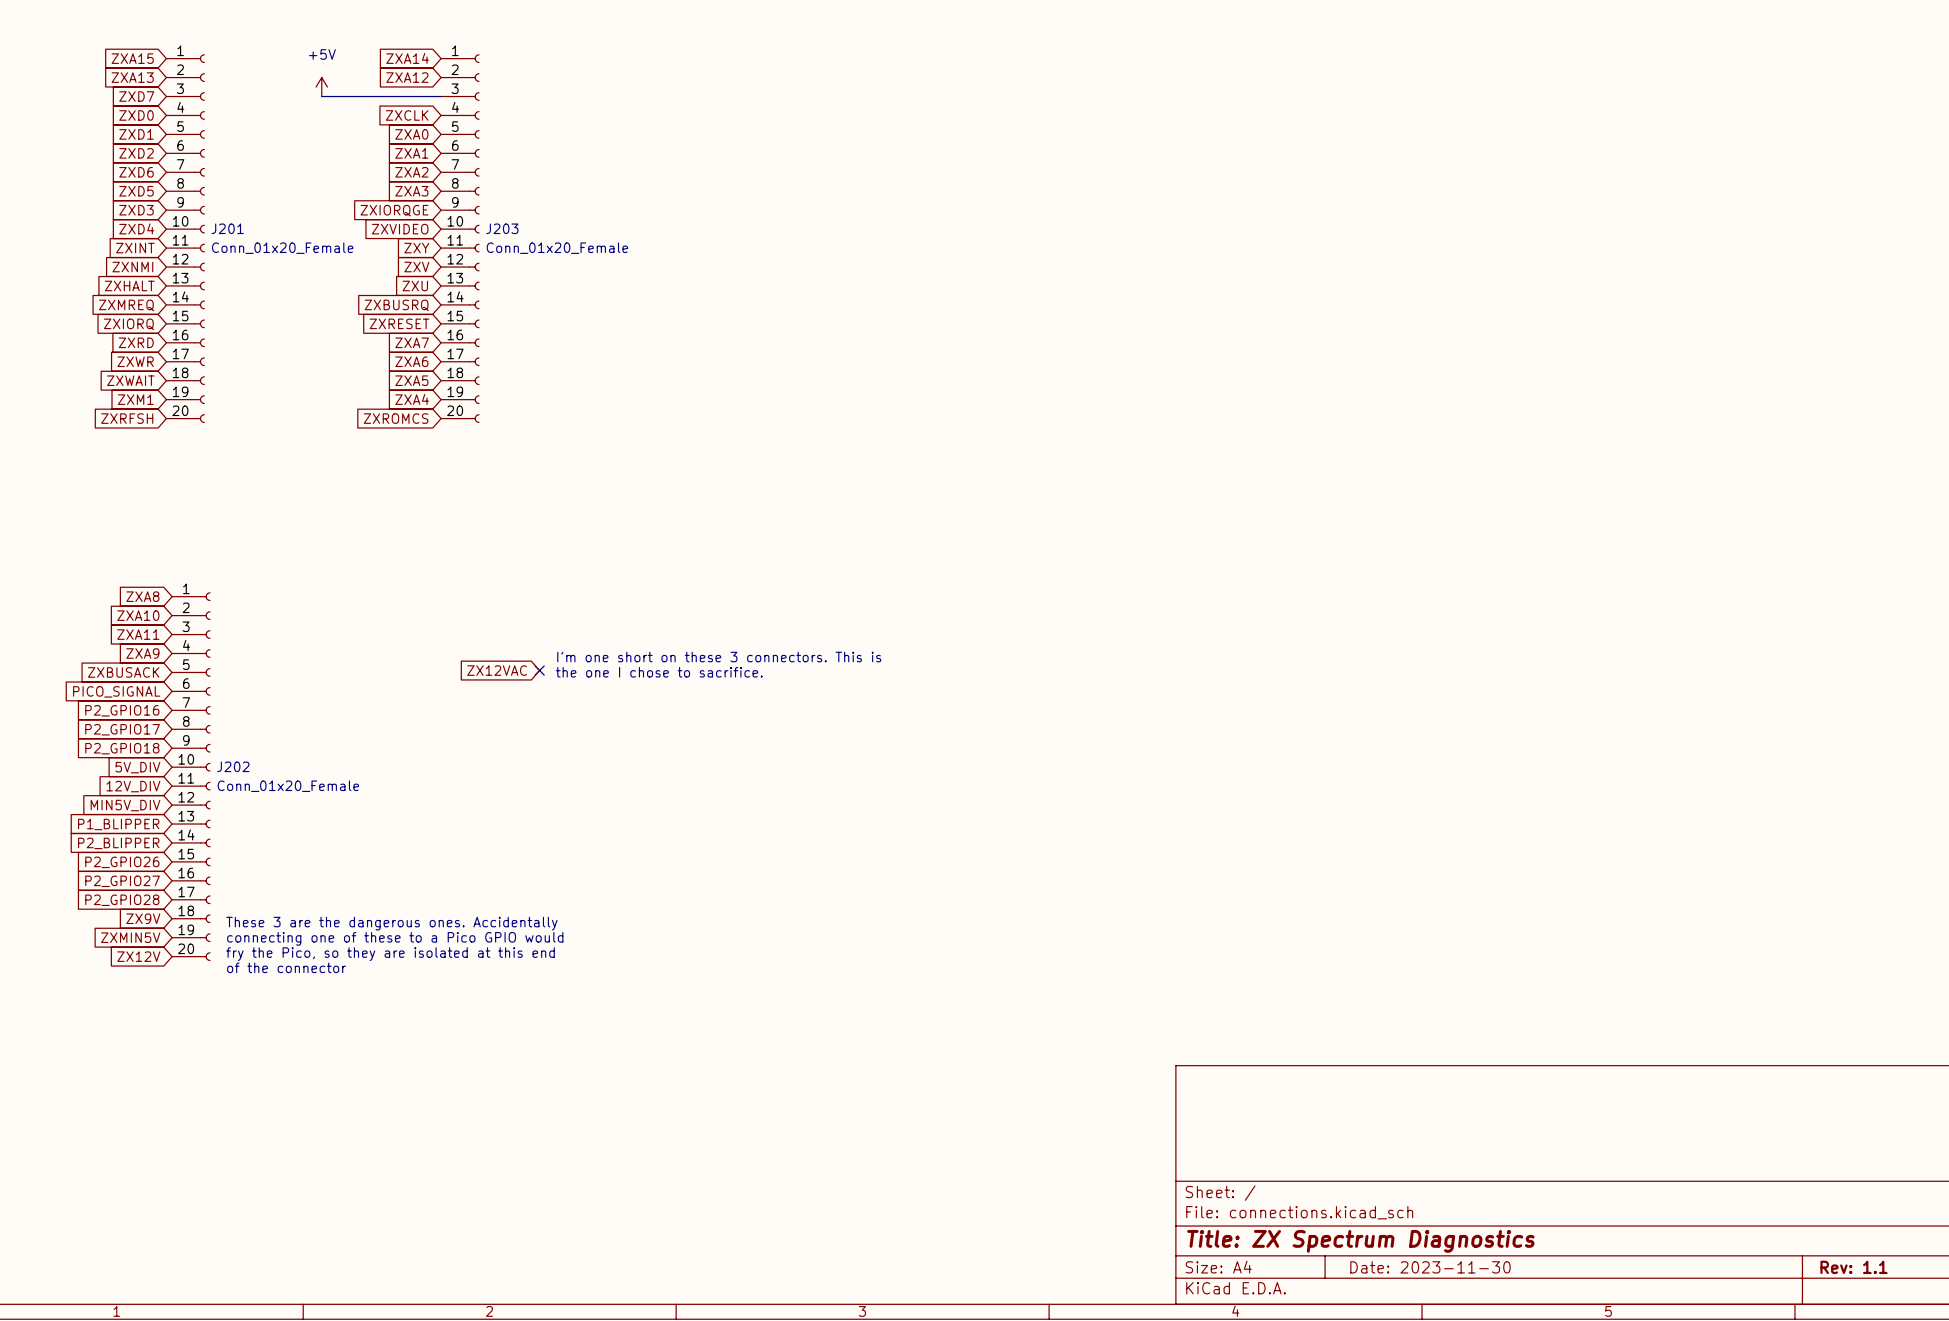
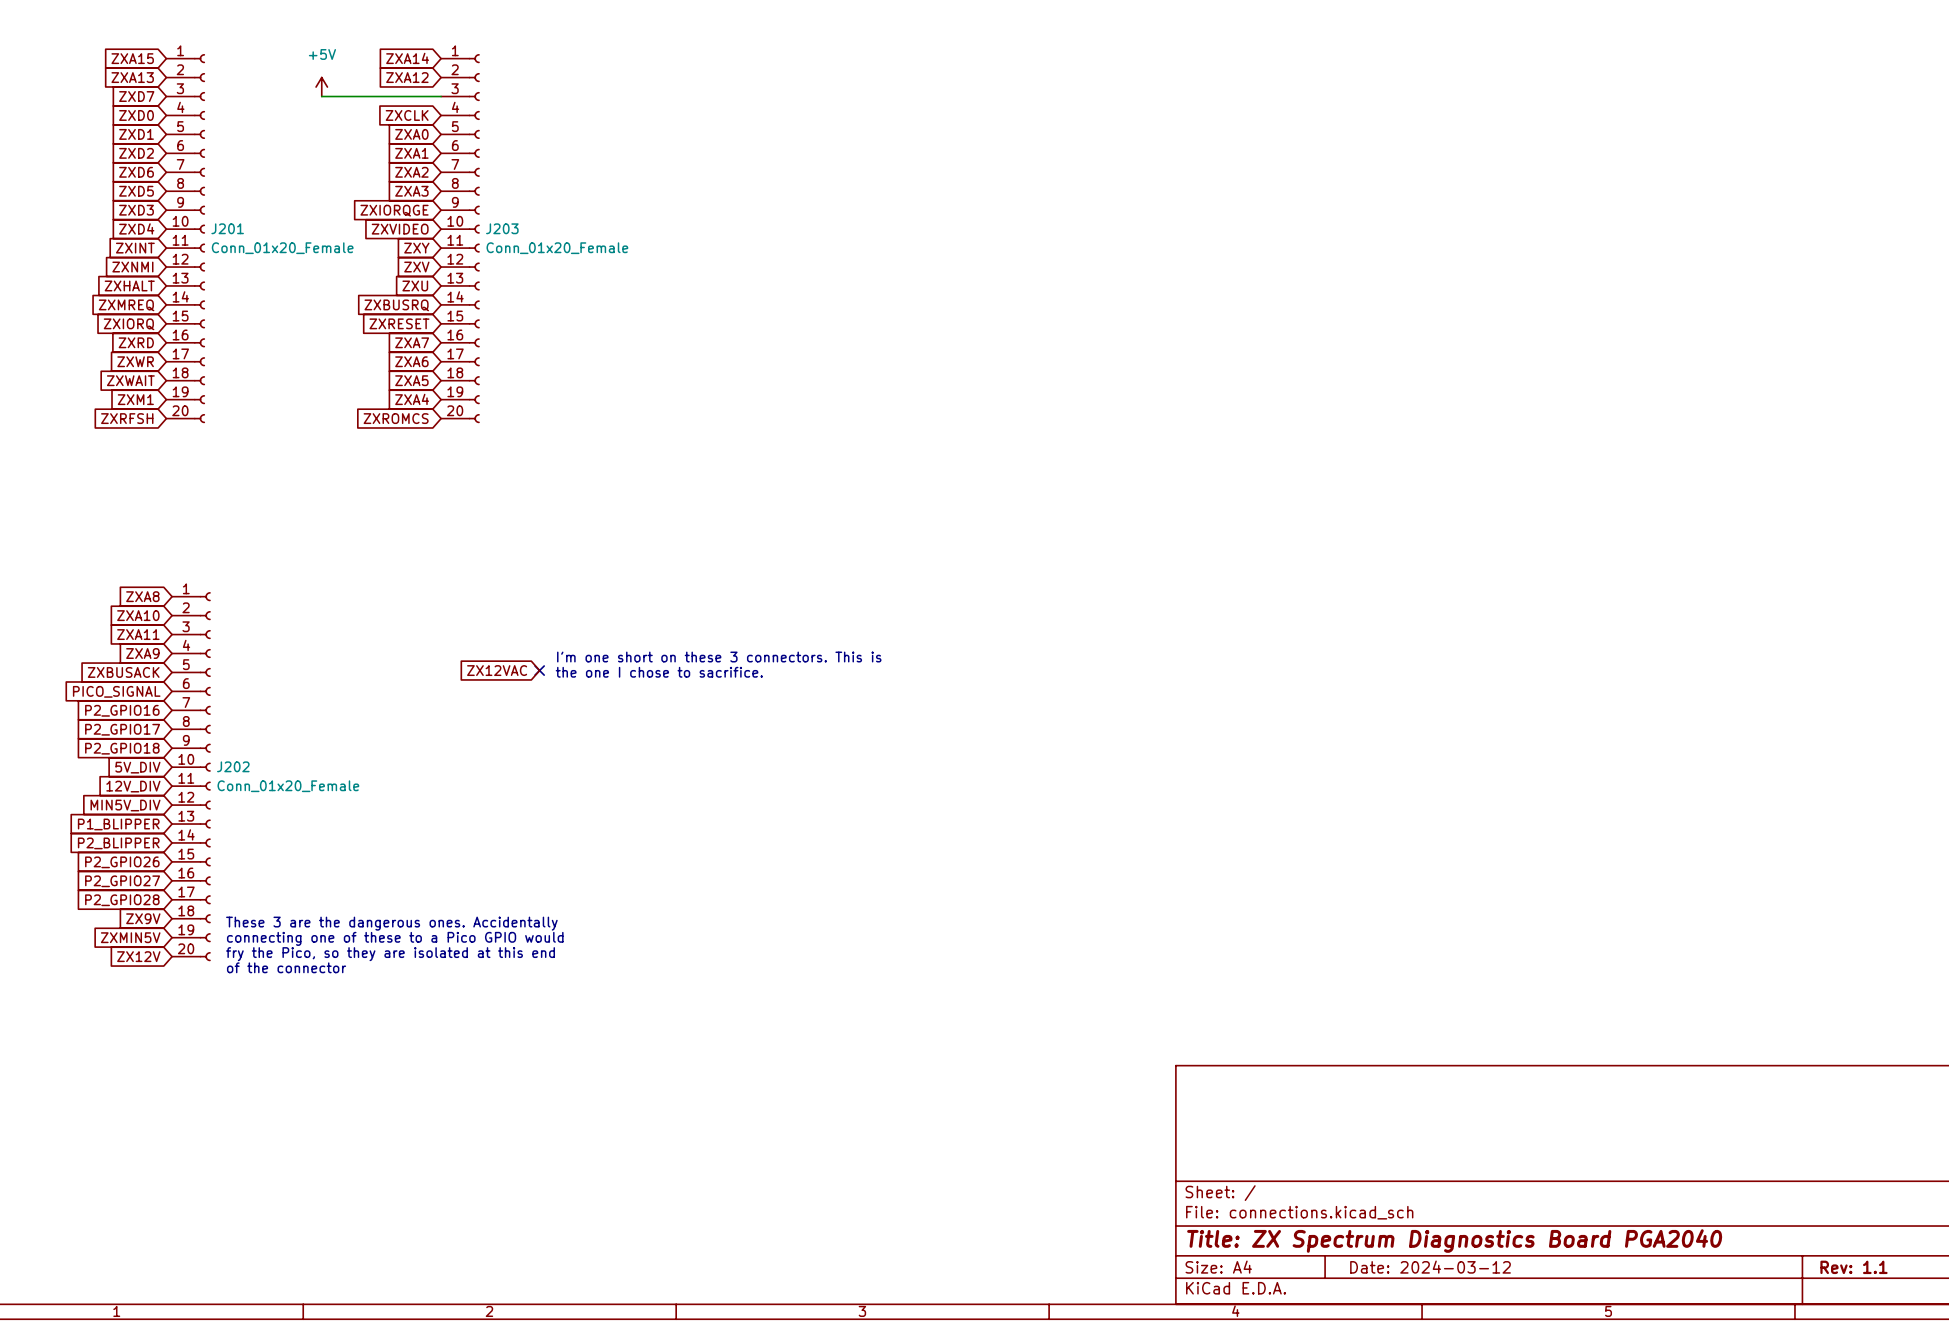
title block: Title: ZX Spectrum Diagnostics (1360, 1241) -> Title: ZX Spectrum Diagnostics Board PGA2040 (1454, 1241)
title block: Date: 2023-11-30 (1430, 1267) -> Date: 2024-03-12 (1430, 1267)

